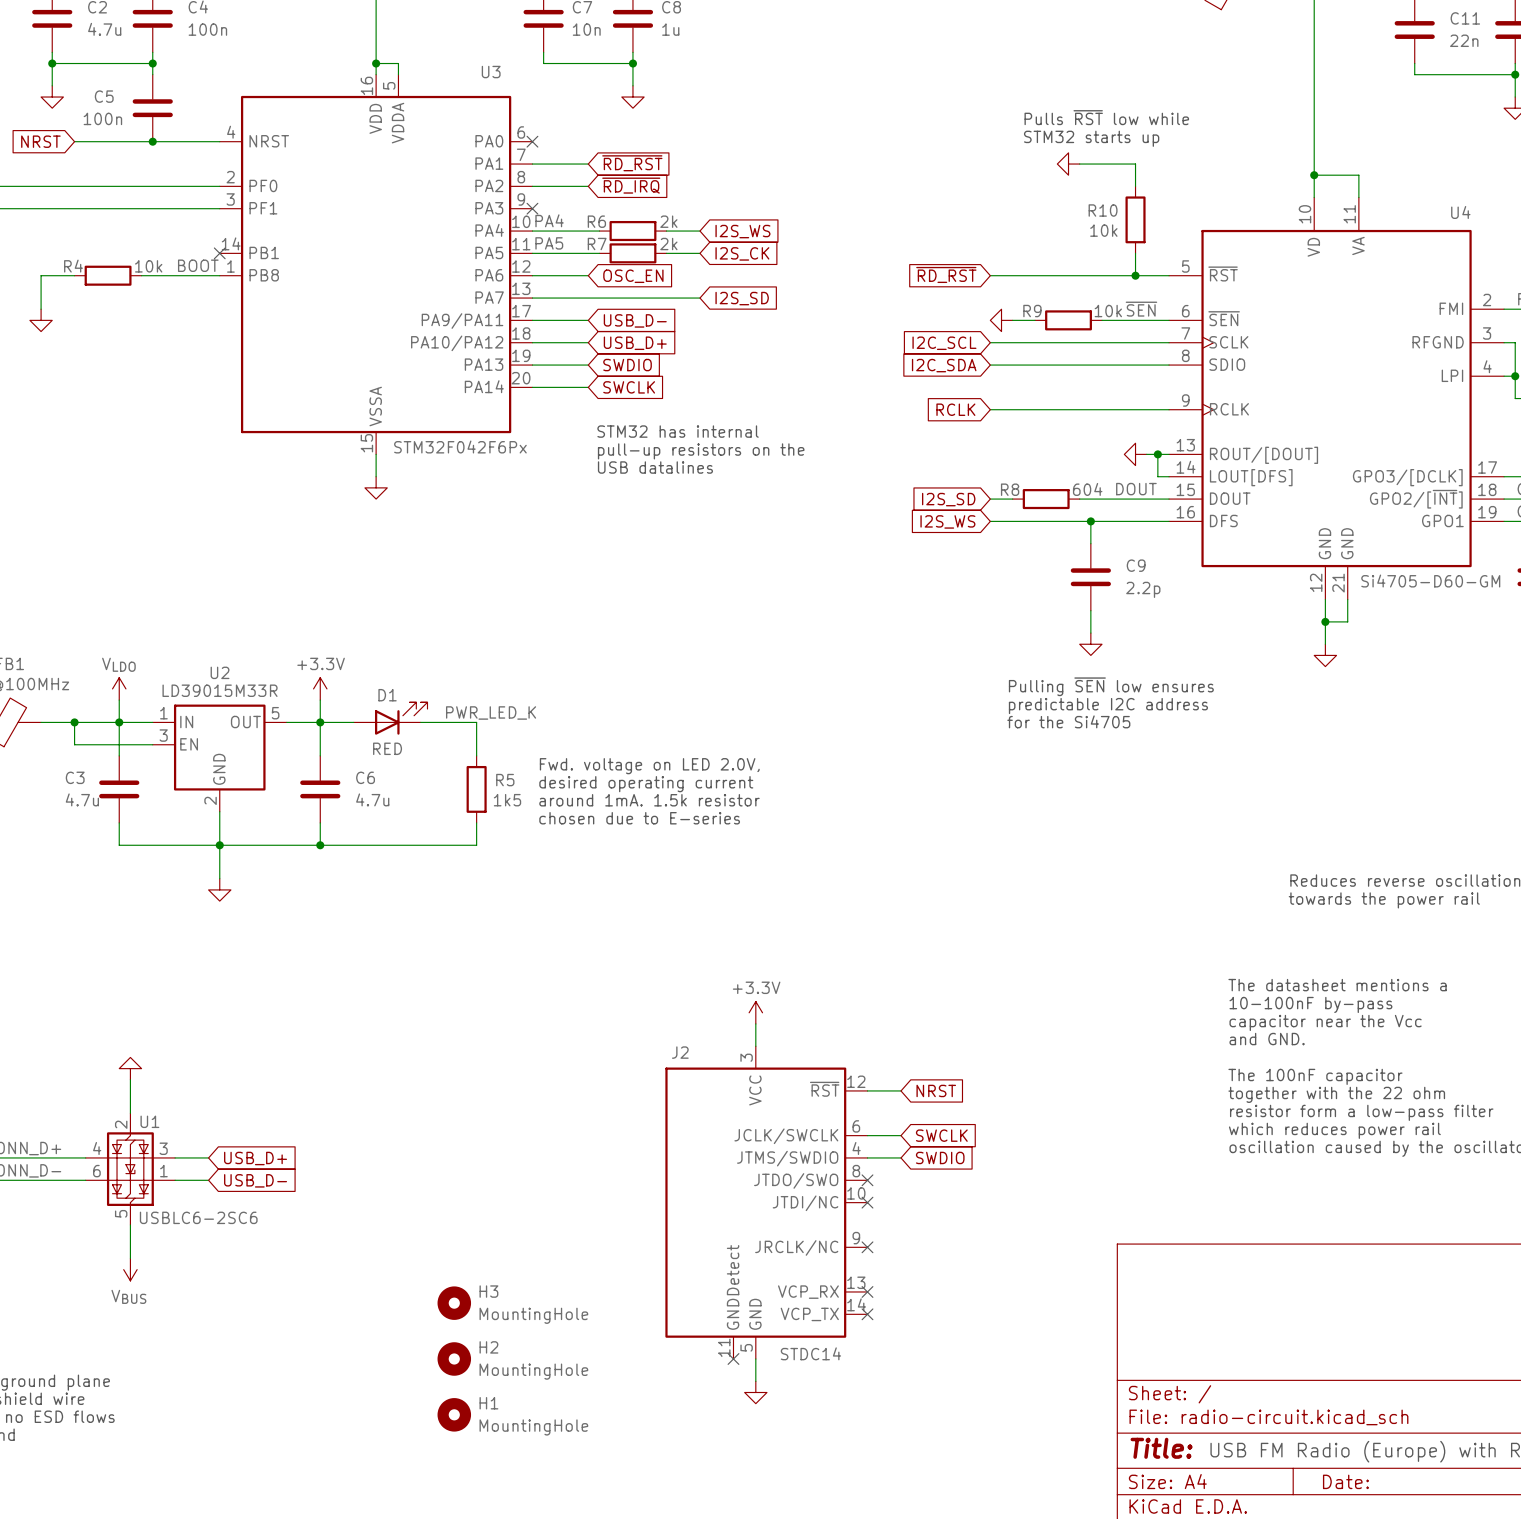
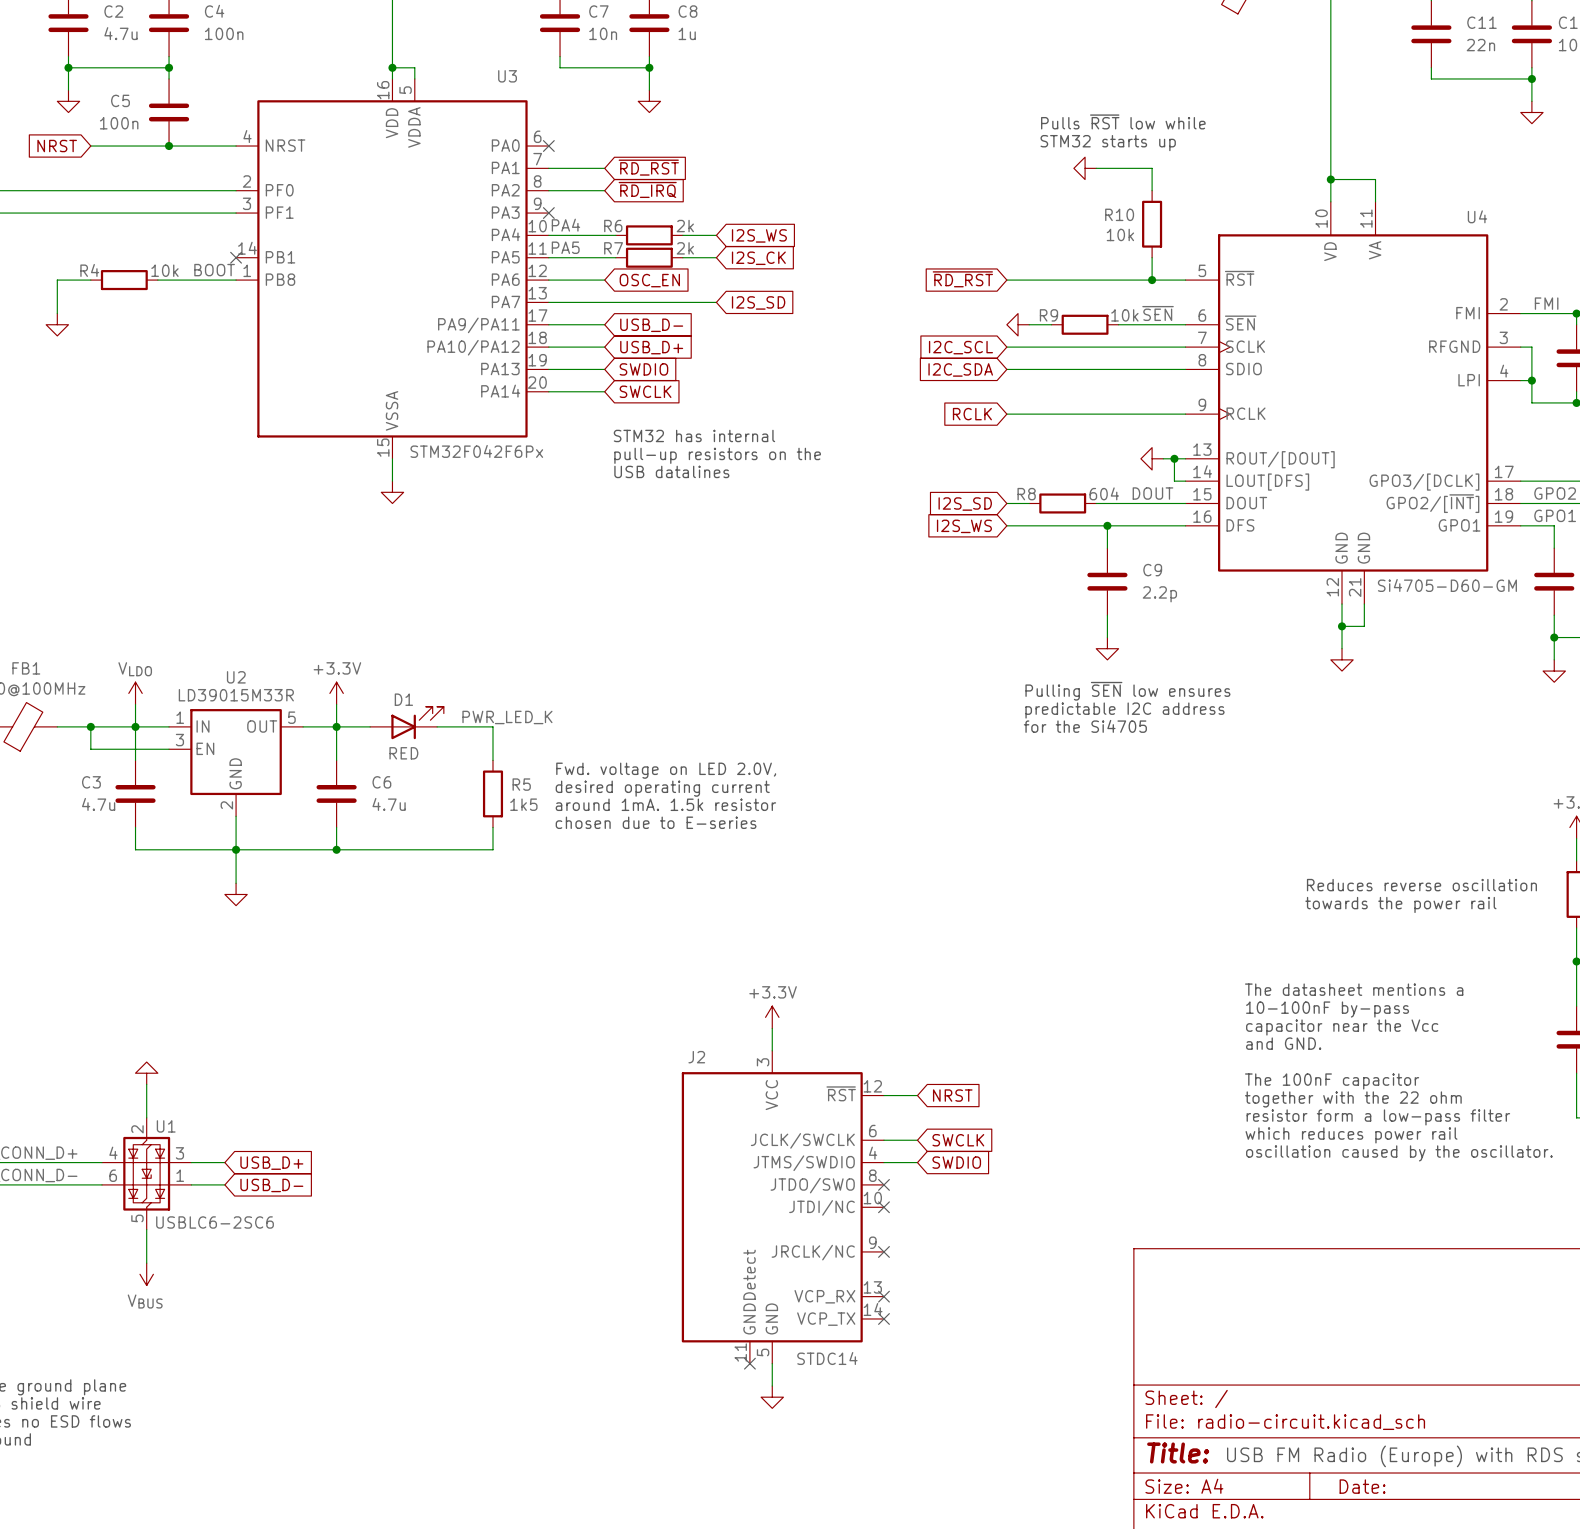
H3: MountingHole (454, 1303) -> none
H2: MountingHole (454, 1358) -> none
H1: MountingHole (454, 1414) -> none

